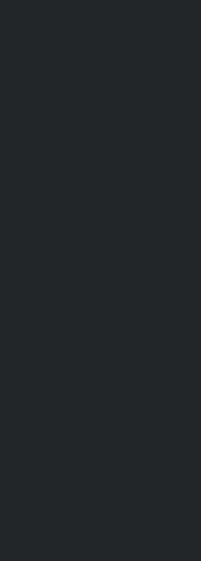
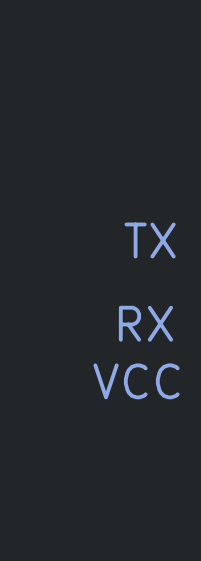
text: none -> TX (150, 240)
text: none -> RX (145, 323)
text: none -> VCC (136, 381)

